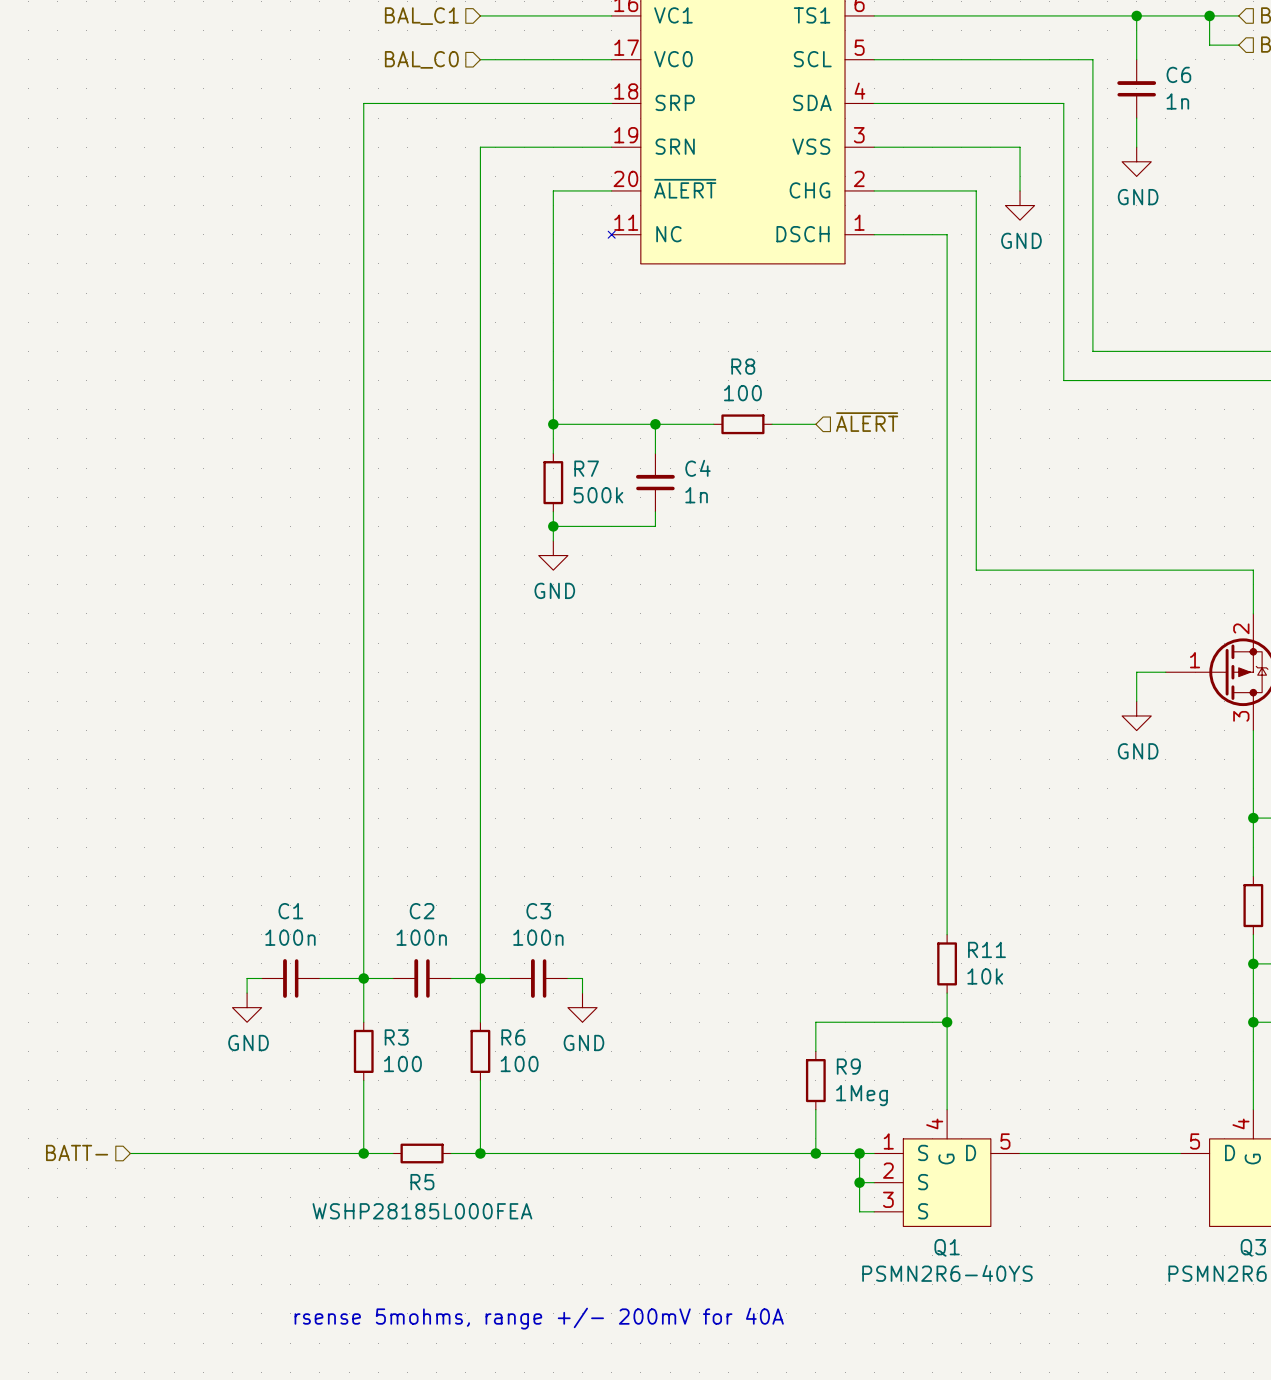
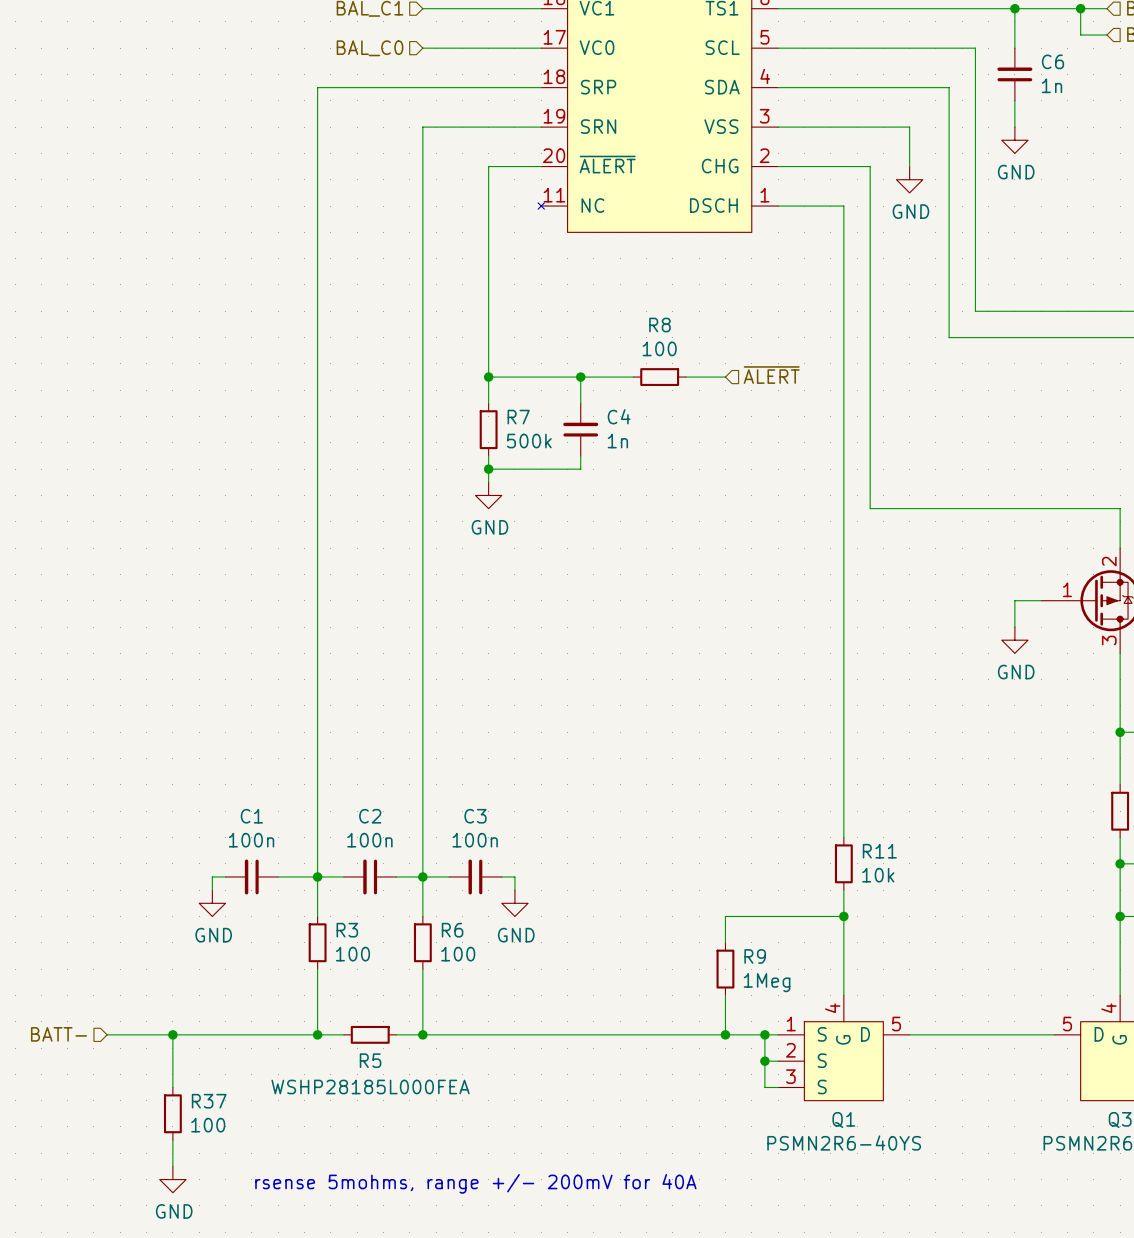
wire: none -> (172, 1034) (172, 1087)
junction: none -> (172, 1034)
R37: none -> 100 (172, 1113)
wire: none -> (172, 1140) (172, 1166)
power symbol: none -> GND (172, 1179)

